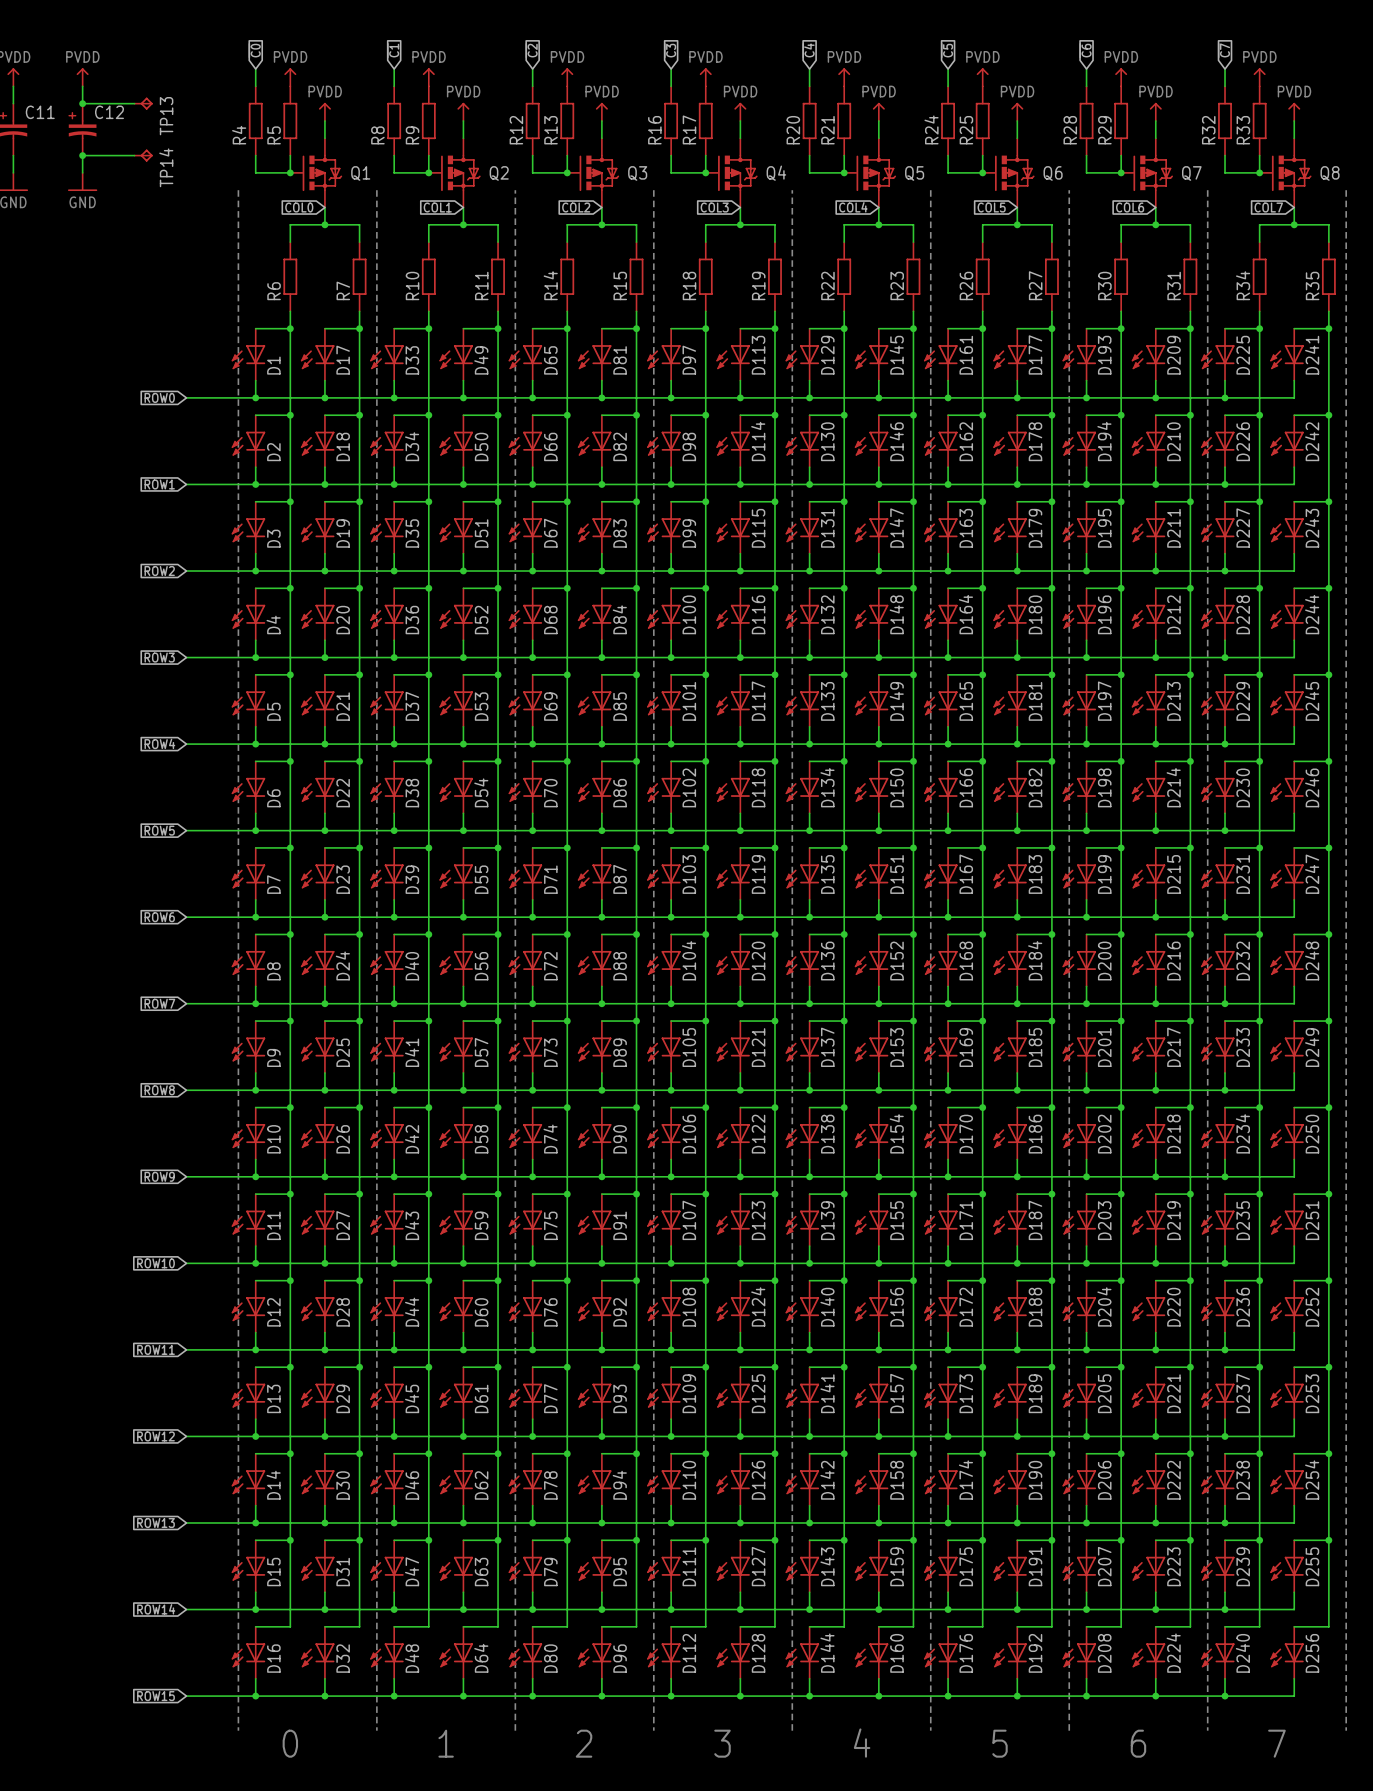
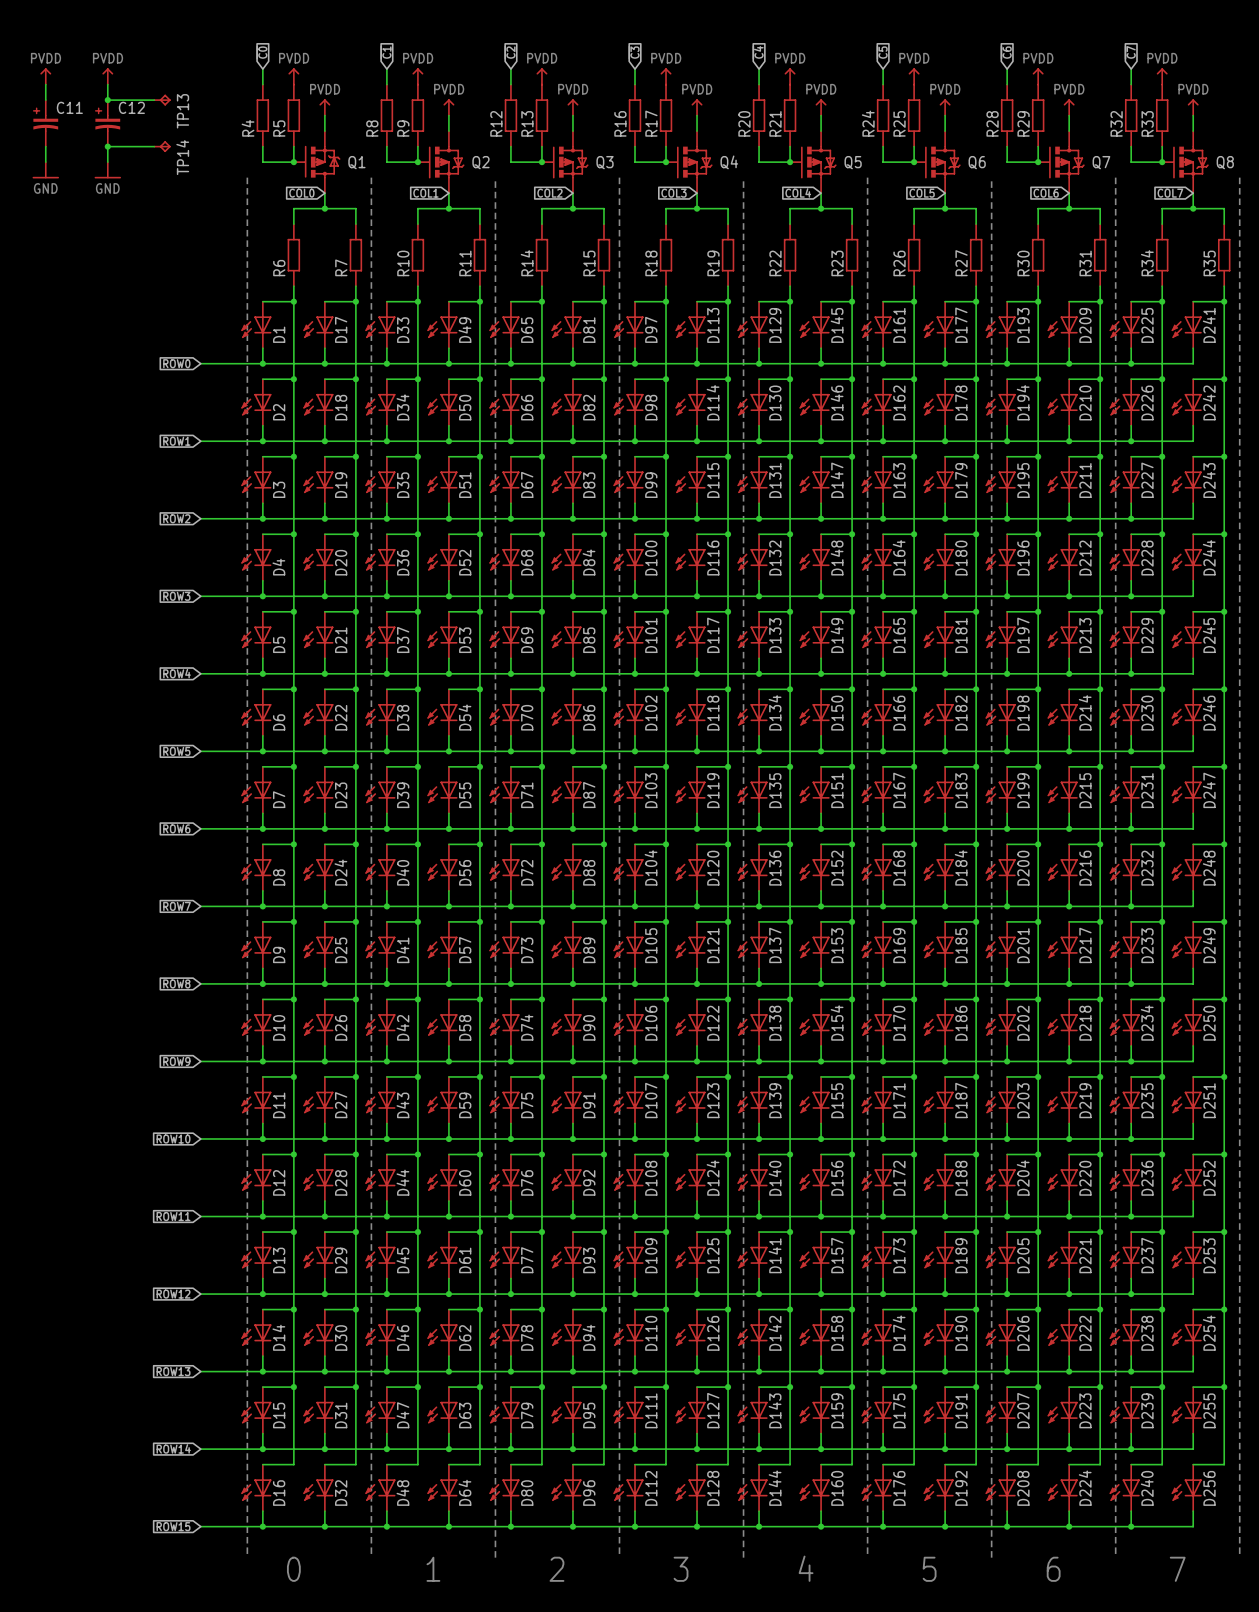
Q1 flip: as is (315, 173) -> up-down (316, 161)

